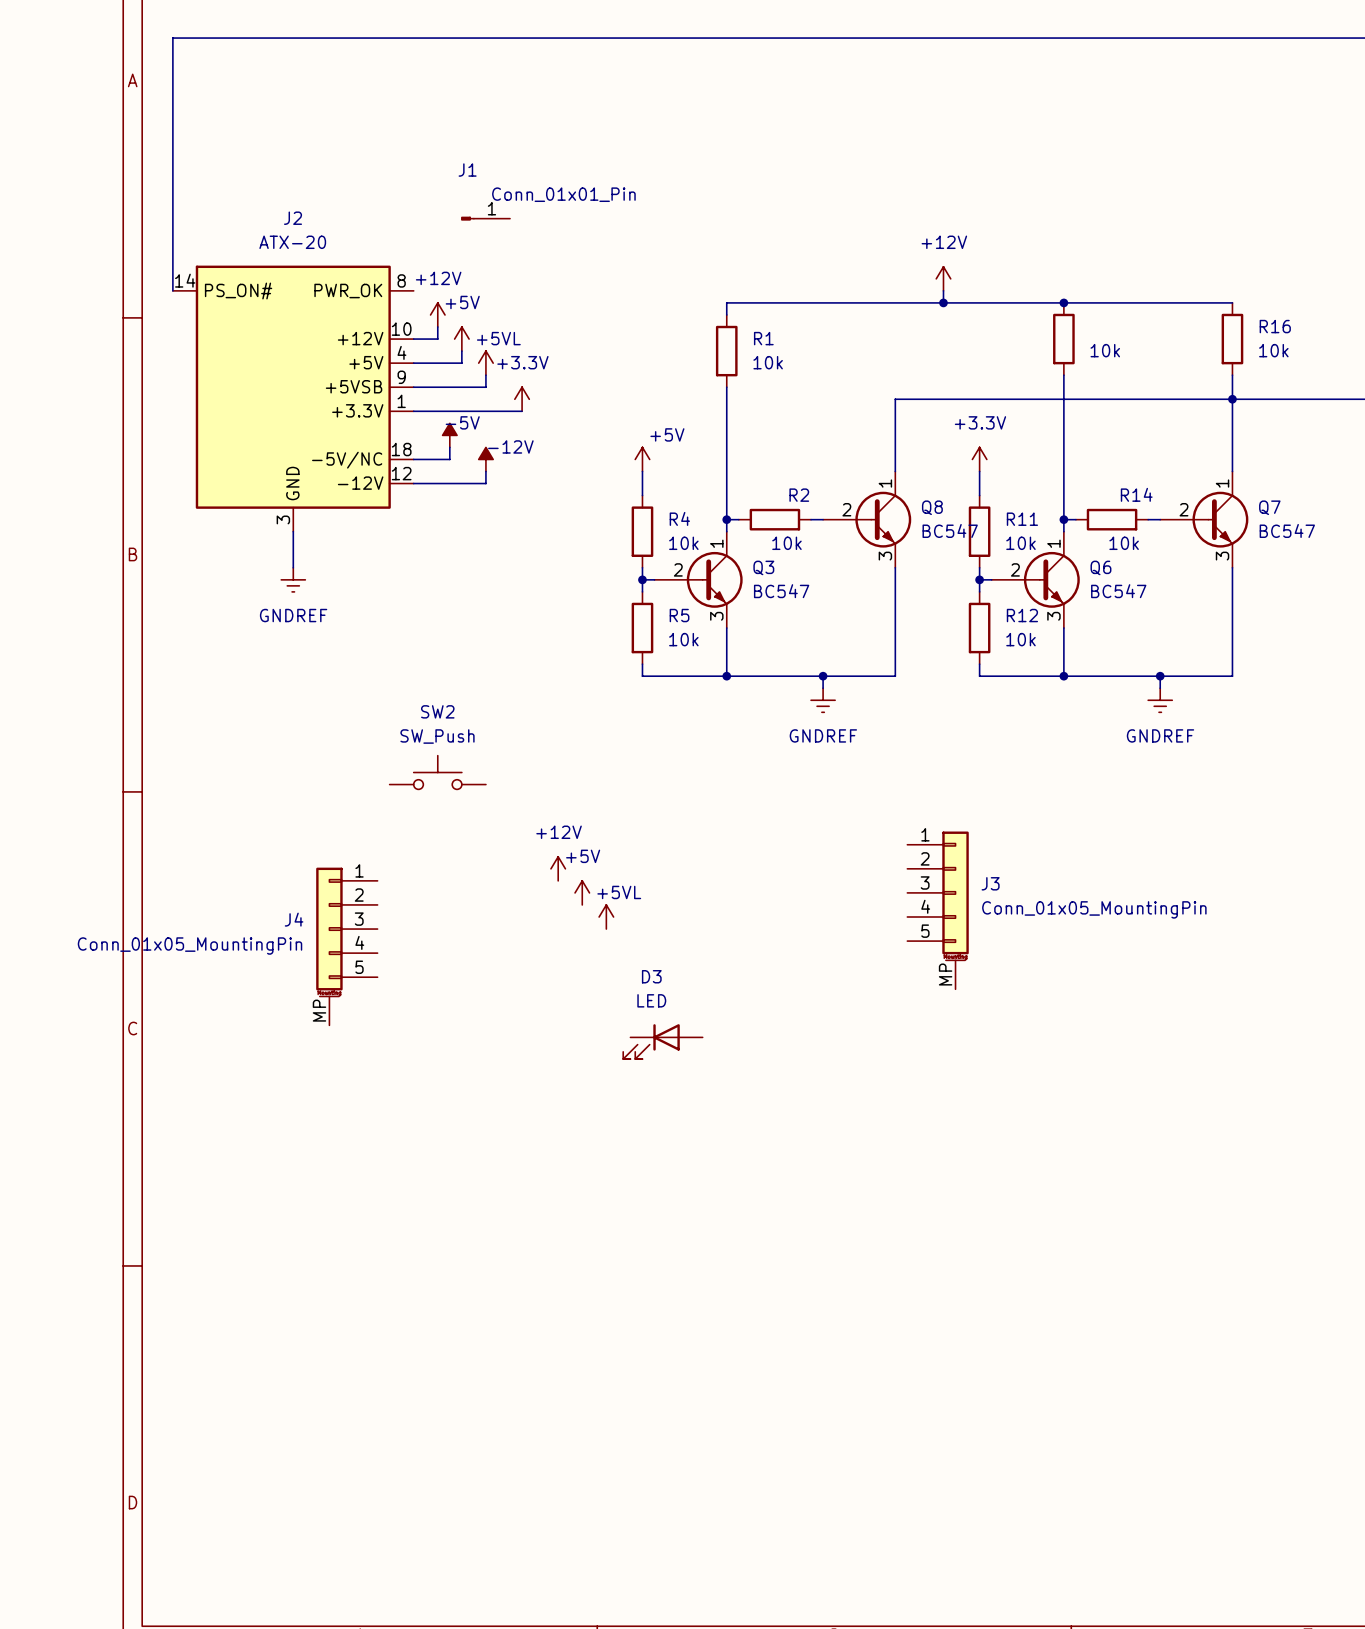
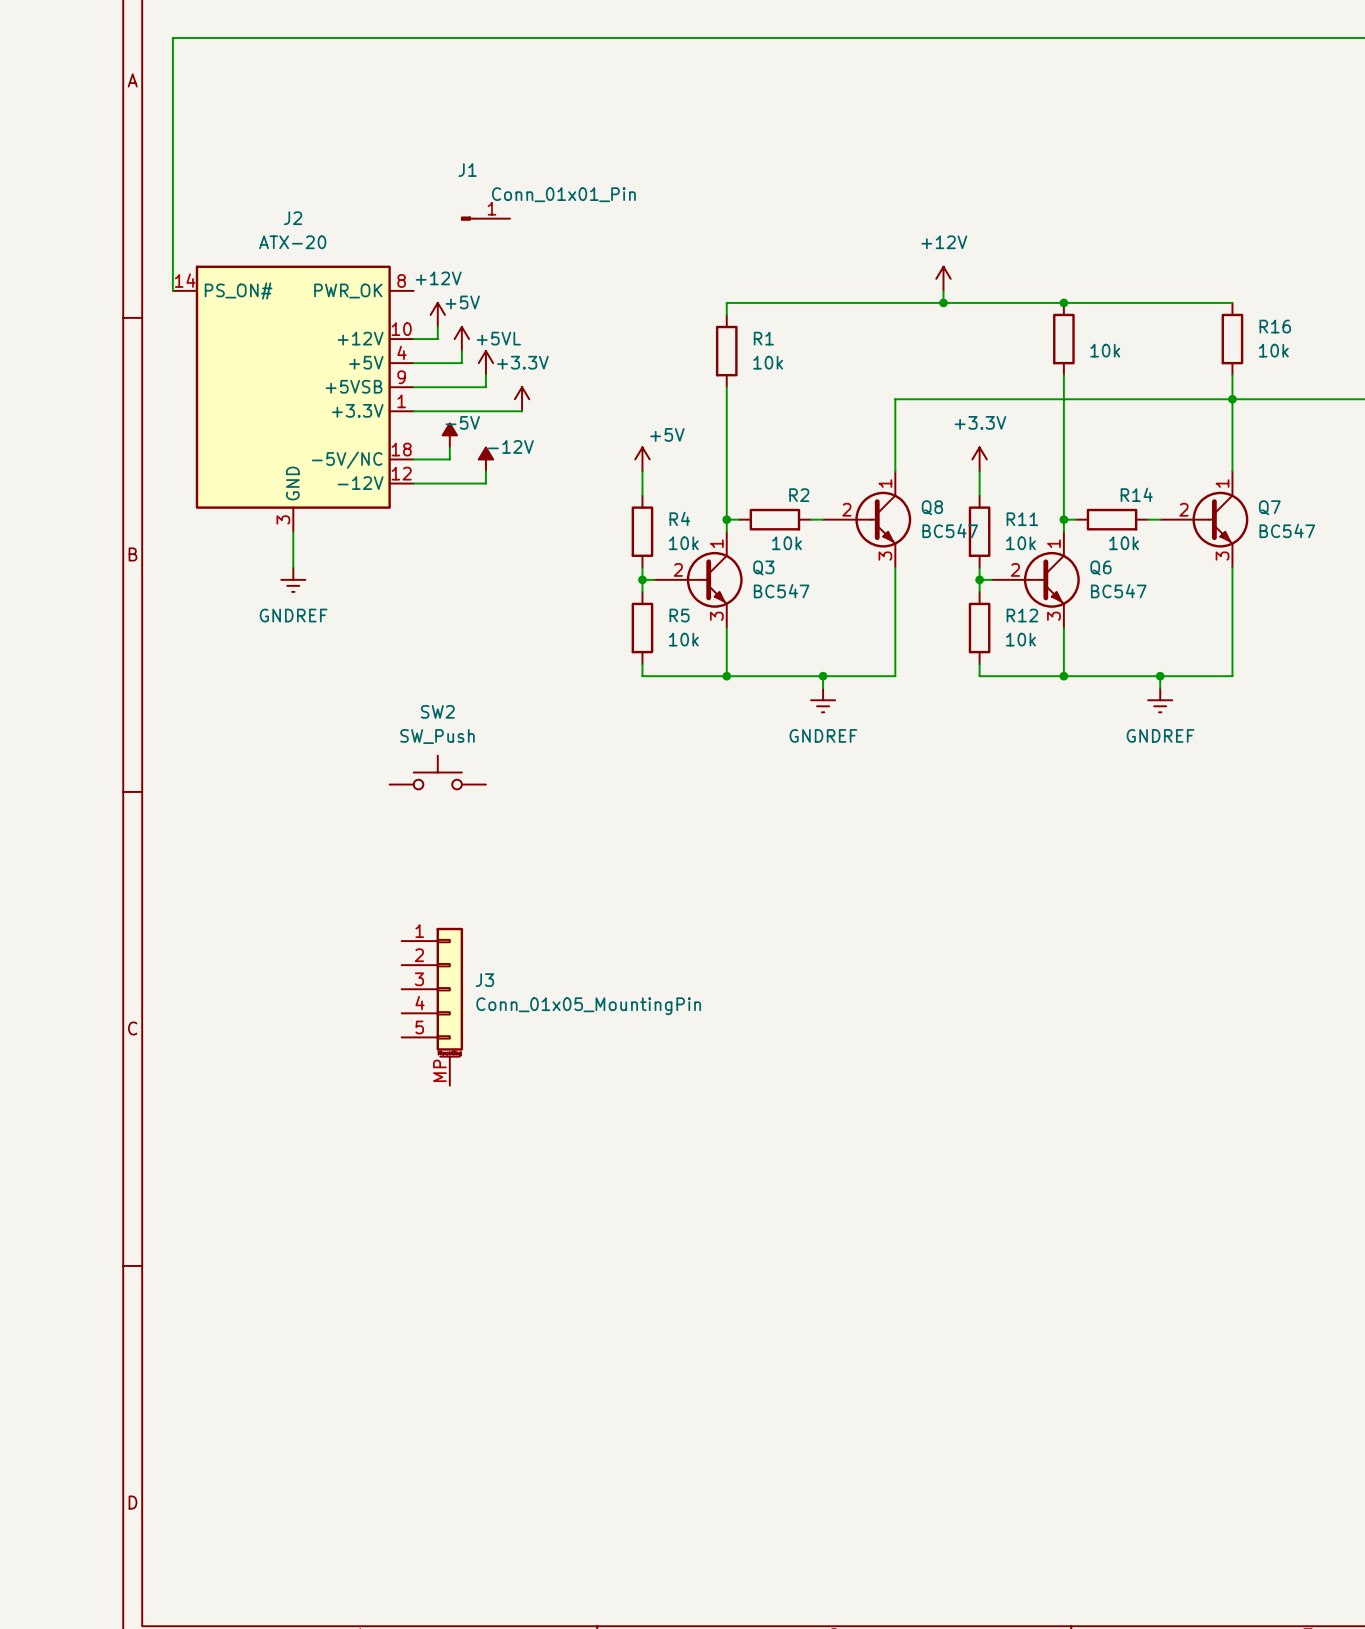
power symbol: +12V (558, 868) -> none
power symbol: +5V (582, 892) -> none
J3 position: (938, 910) -> (432, 1006)
power symbol: +5VL (606, 917) -> none
J4: Conn_01x05_MountingPin (346, 946) -> none
D3: LED (662, 1041) -> none

